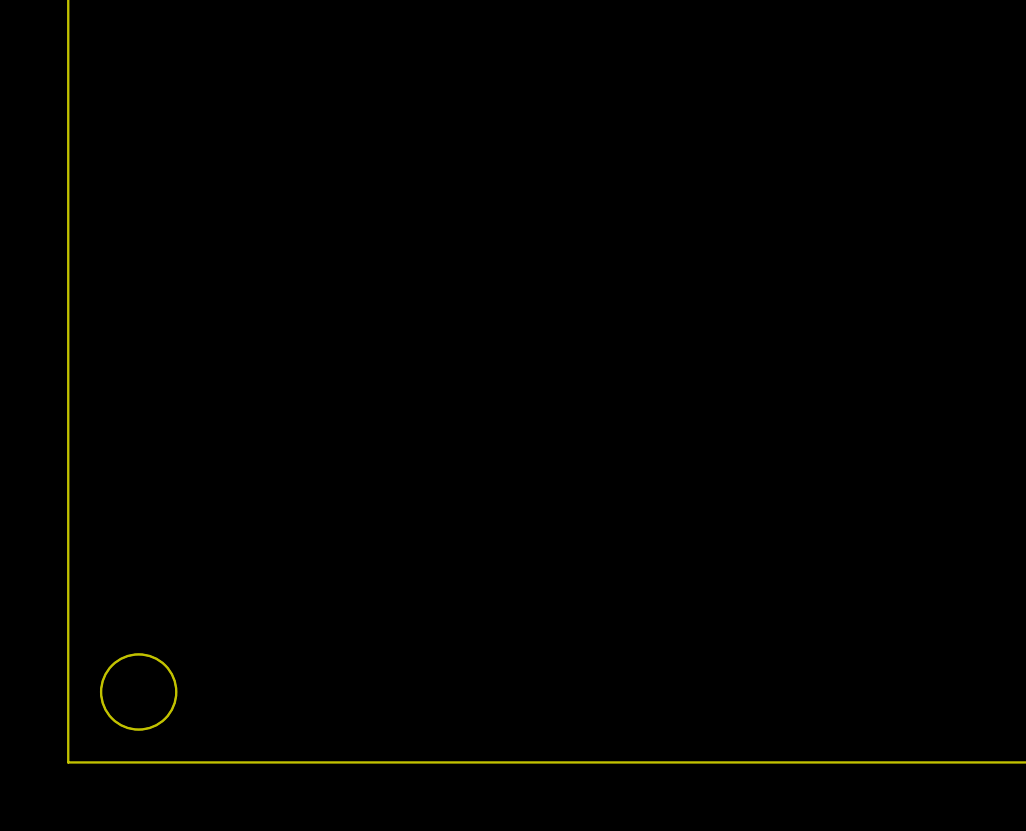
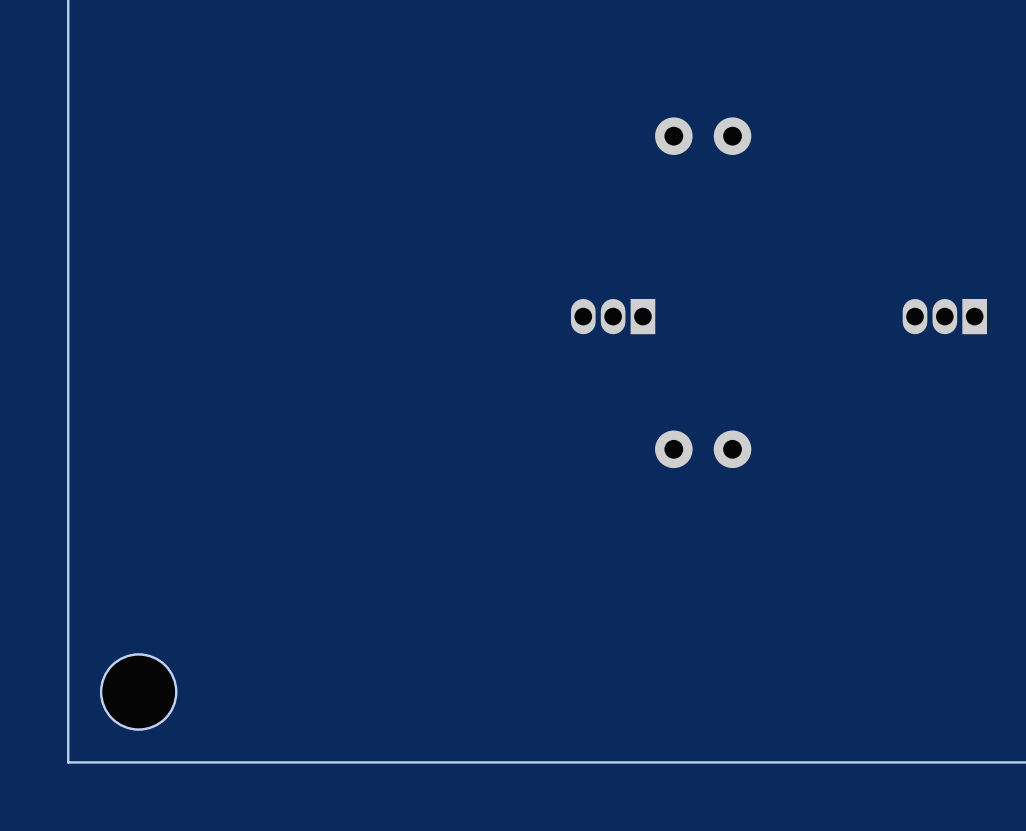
part: none -> (703, 136)
part: none -> (613, 316)
part: none -> (944, 316)
part: none -> (703, 449)

